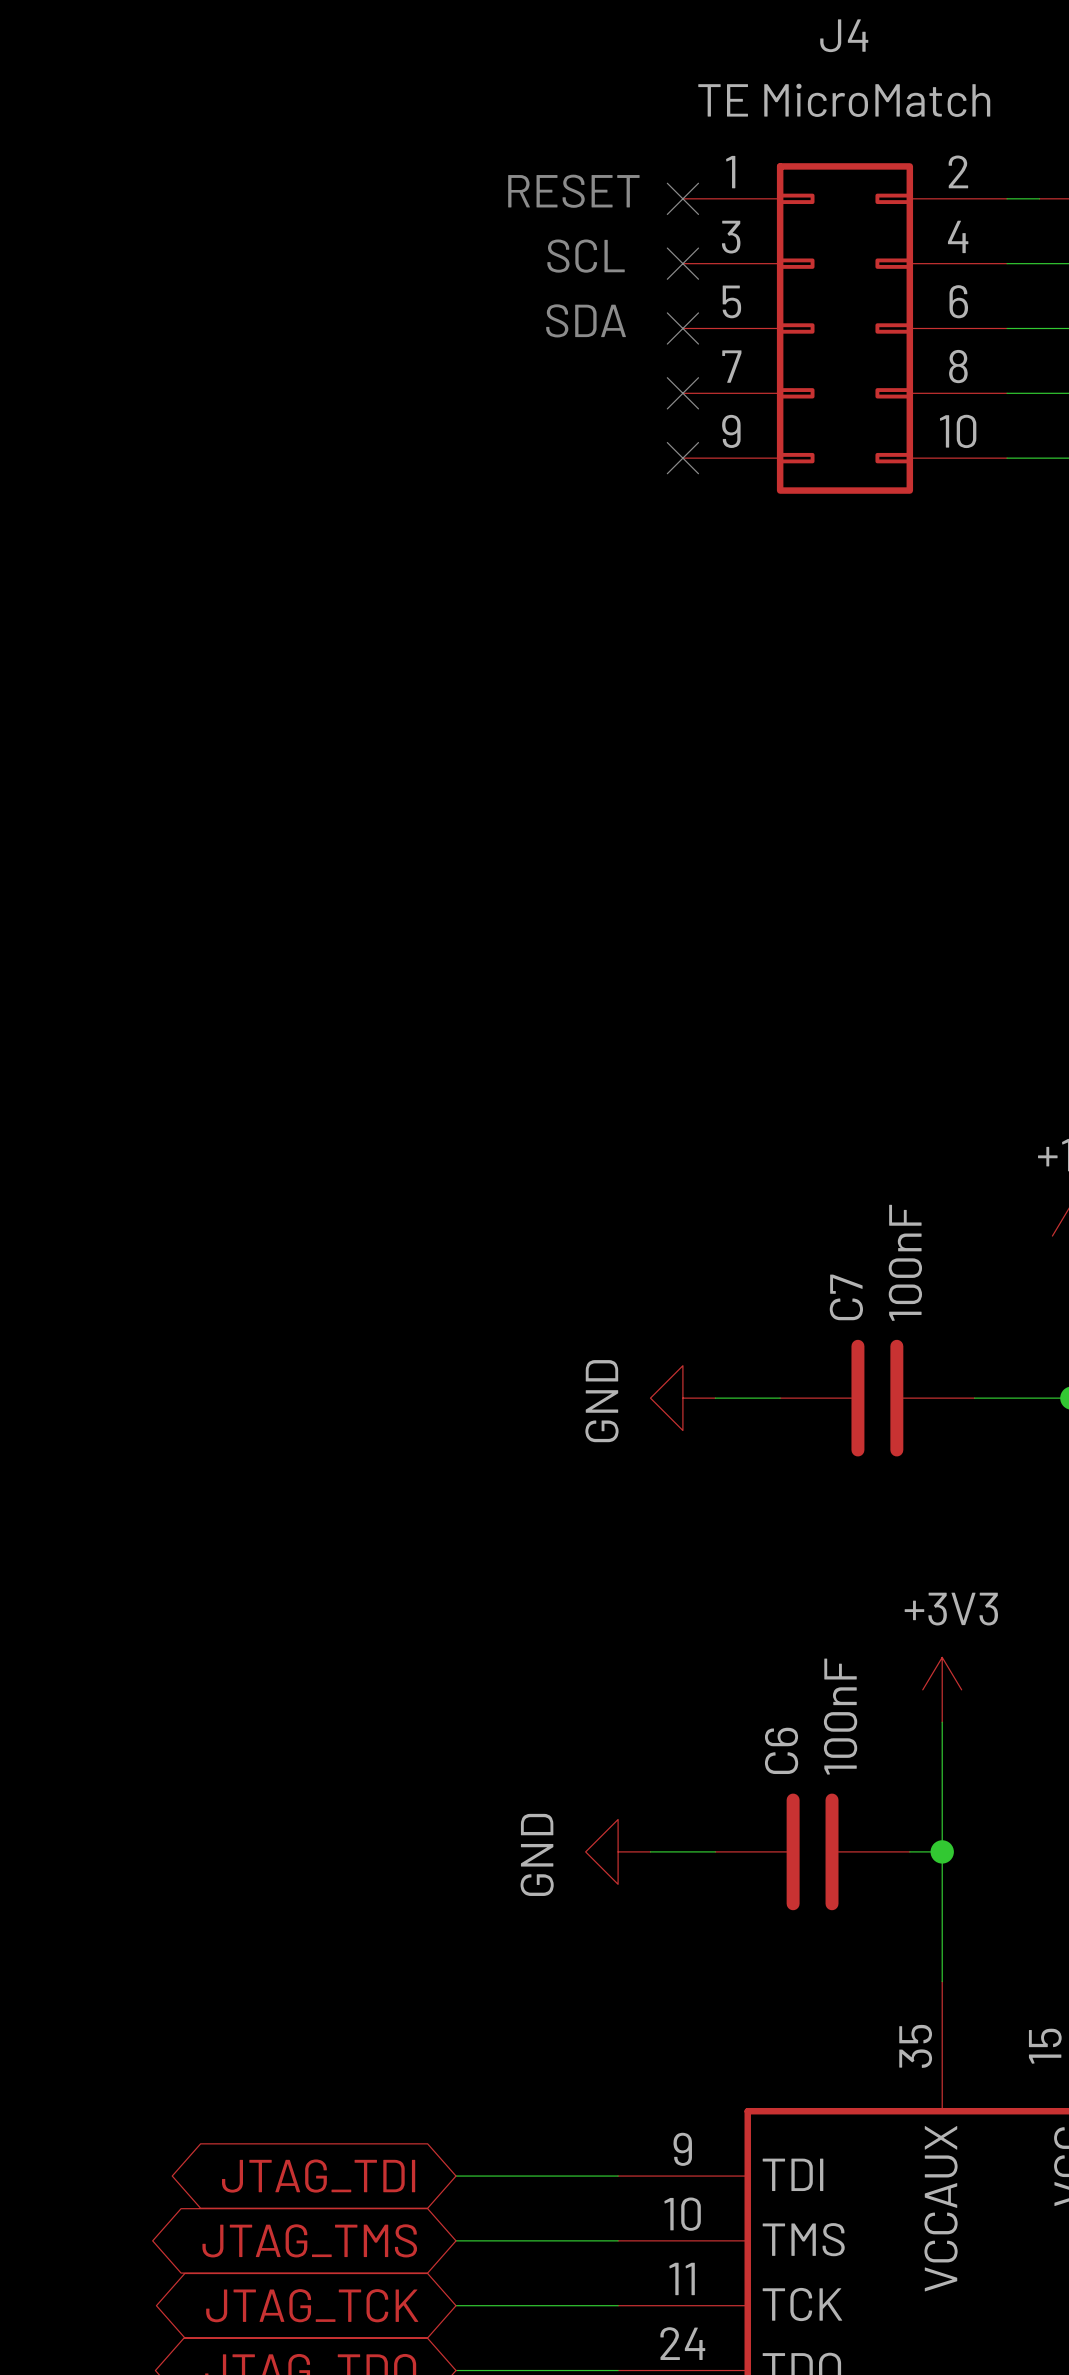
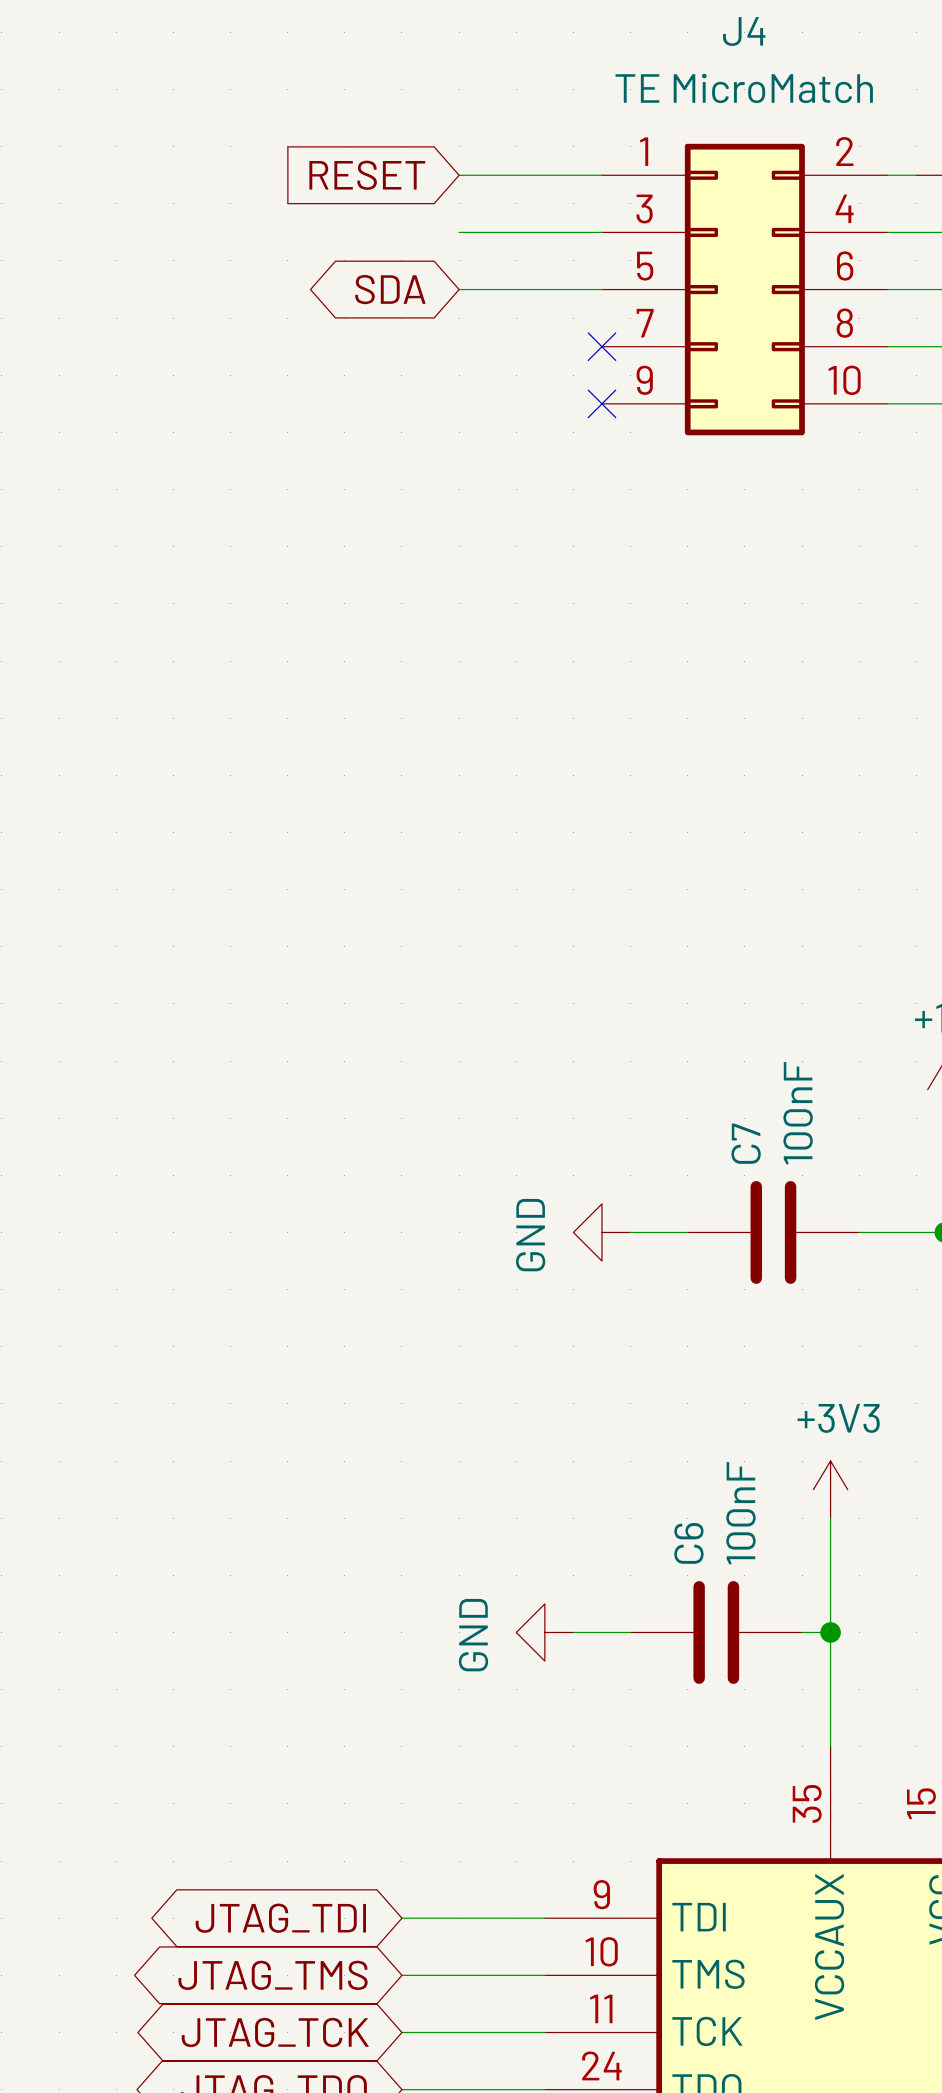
text: RESET (573, 191) -> none
global label: none -> RESET (367, 175)
wire: none -> (459, 175) (602, 175)
no-connect mark: (682, 198) -> none
text: SCL (586, 256) -> none
wire: none -> (459, 232) (602, 232)
no-connect mark: (682, 263) -> none
text: SDA (586, 320) -> none
global label: none -> SDA (390, 289)
wire: none -> (459, 289) (602, 289)
no-connect mark: (682, 328) -> none

